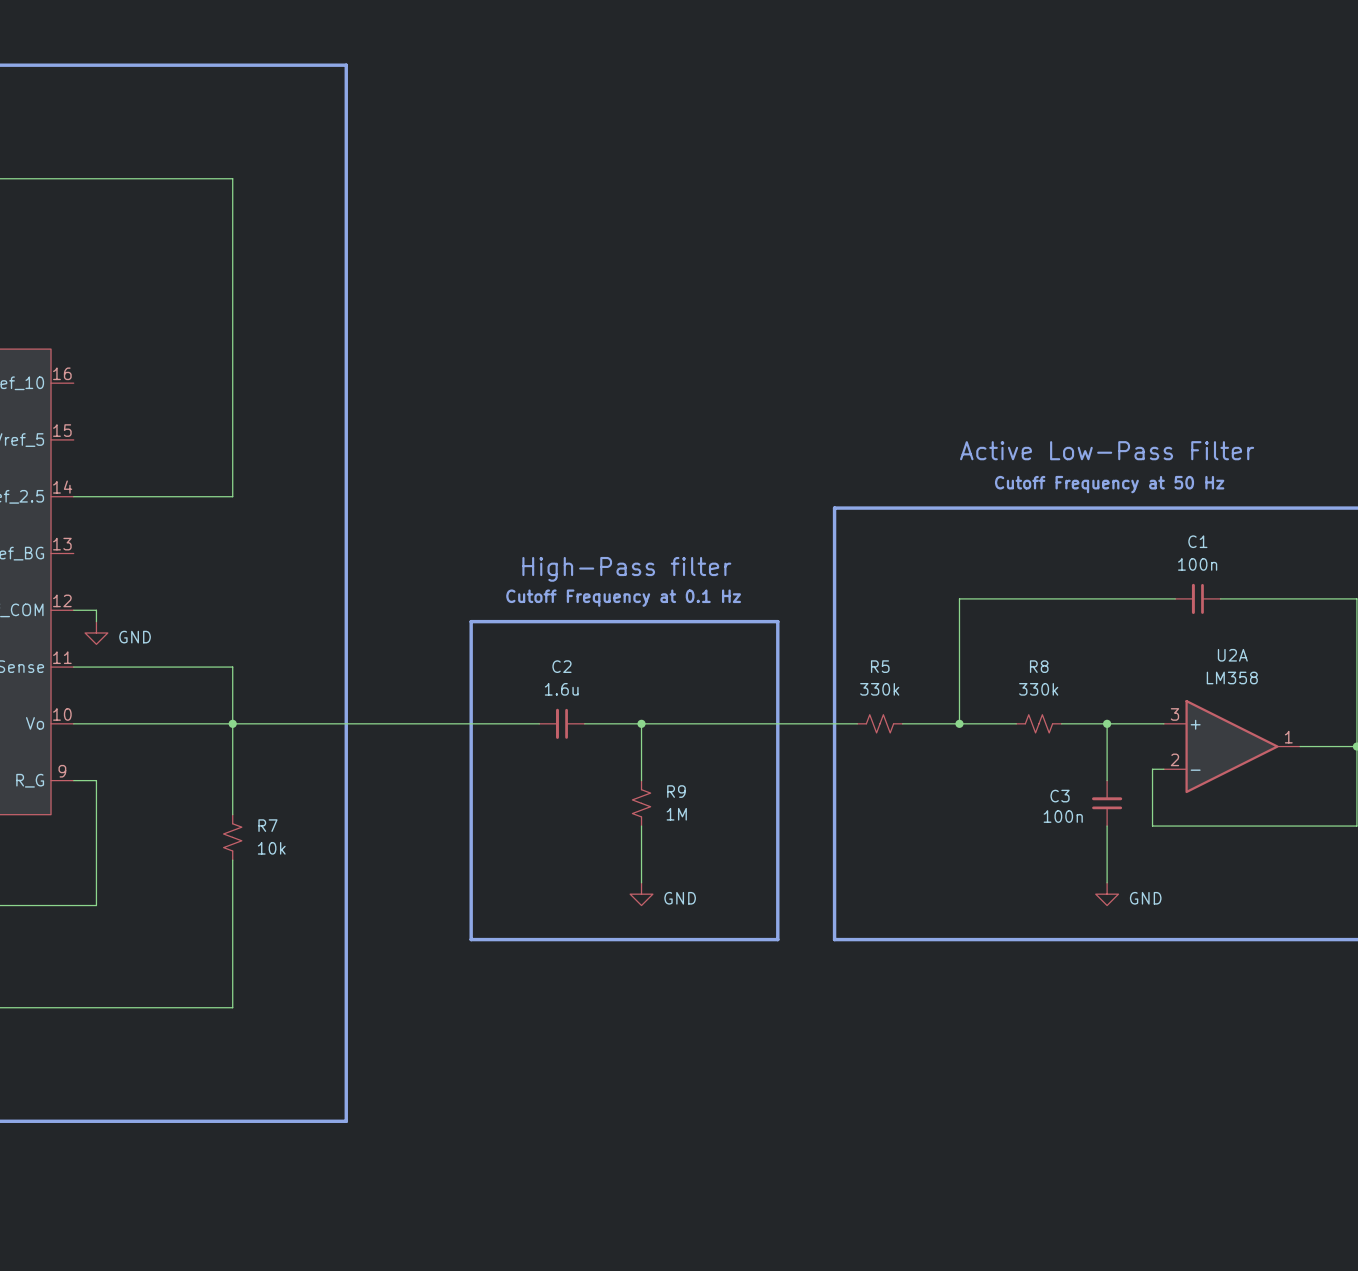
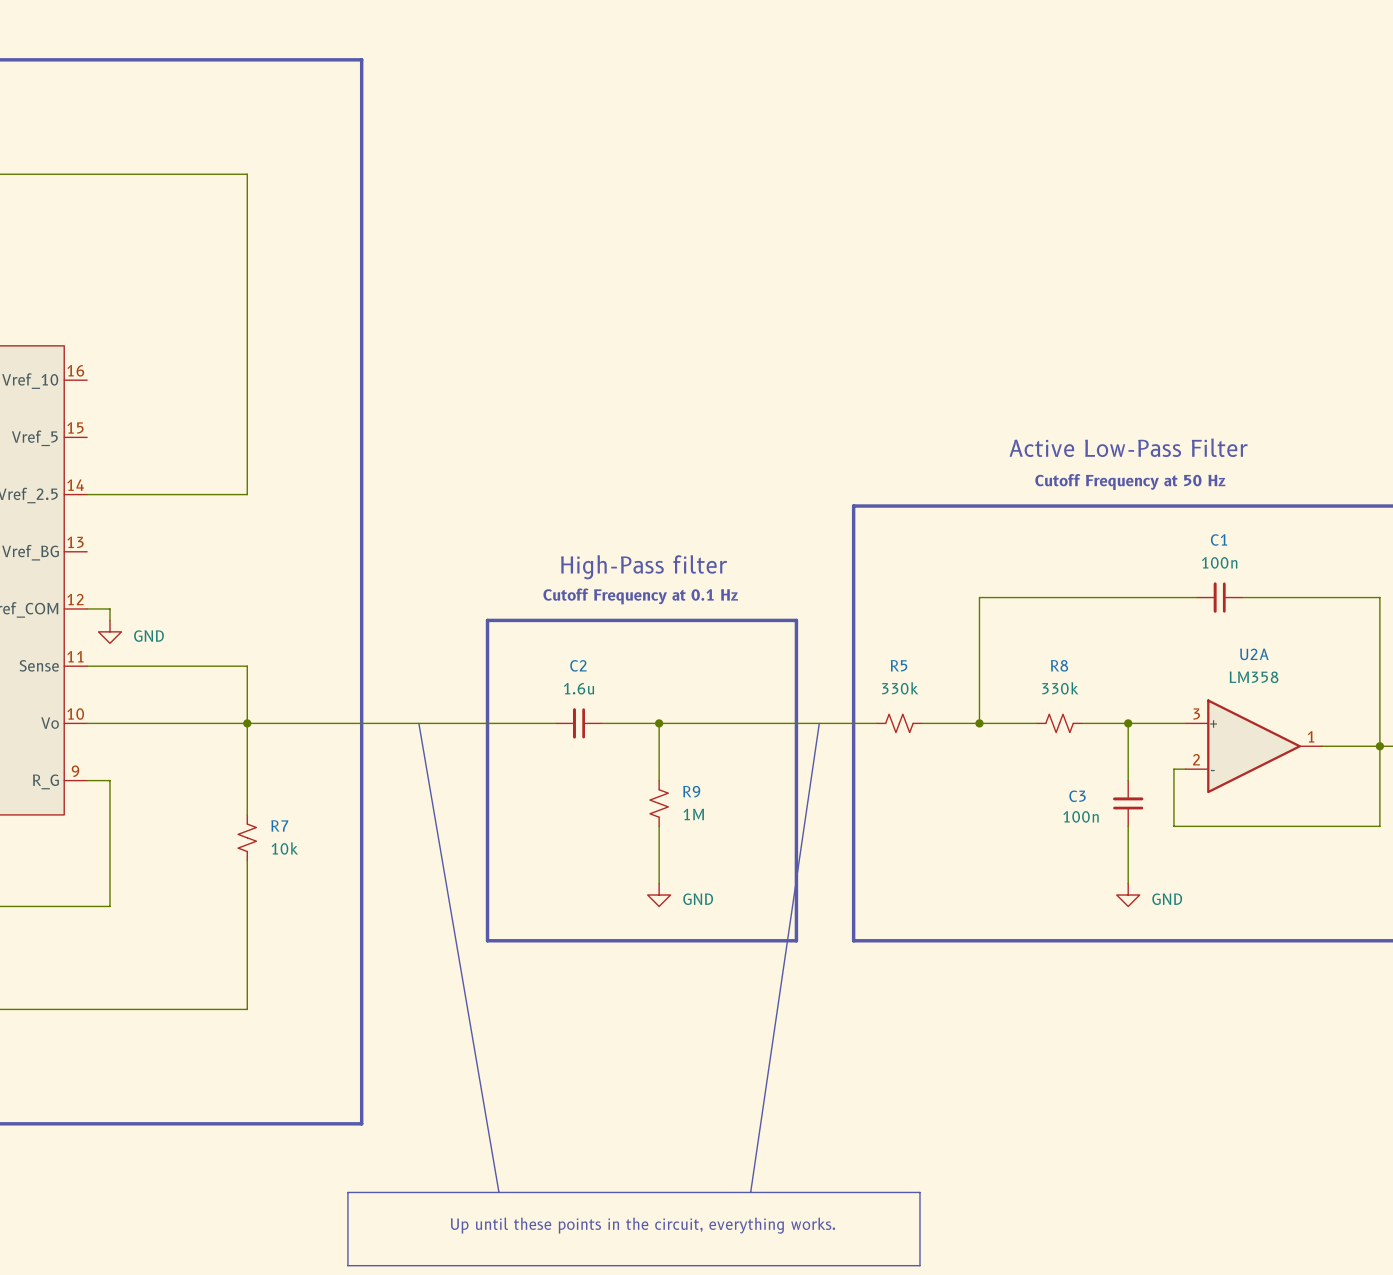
line: none -> (418, 723) (498, 1192)
line: none -> (819, 723) (750, 1192)
line: none -> (347, 1192) (919, 1192) (919, 1265) (347, 1265) (347, 1192)
text: none -> Up until these points in the circuit, everything works. (642, 1225)

